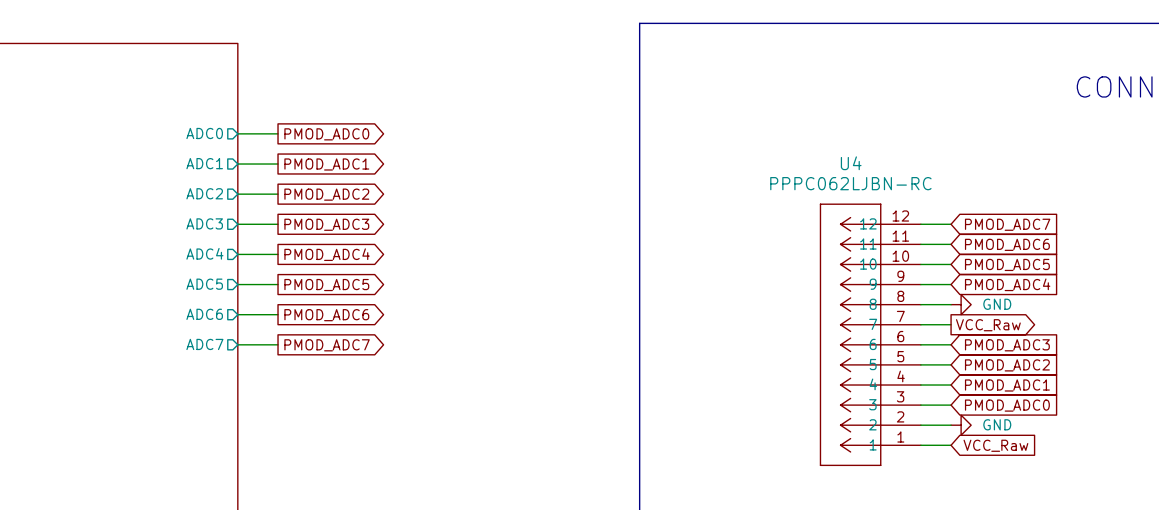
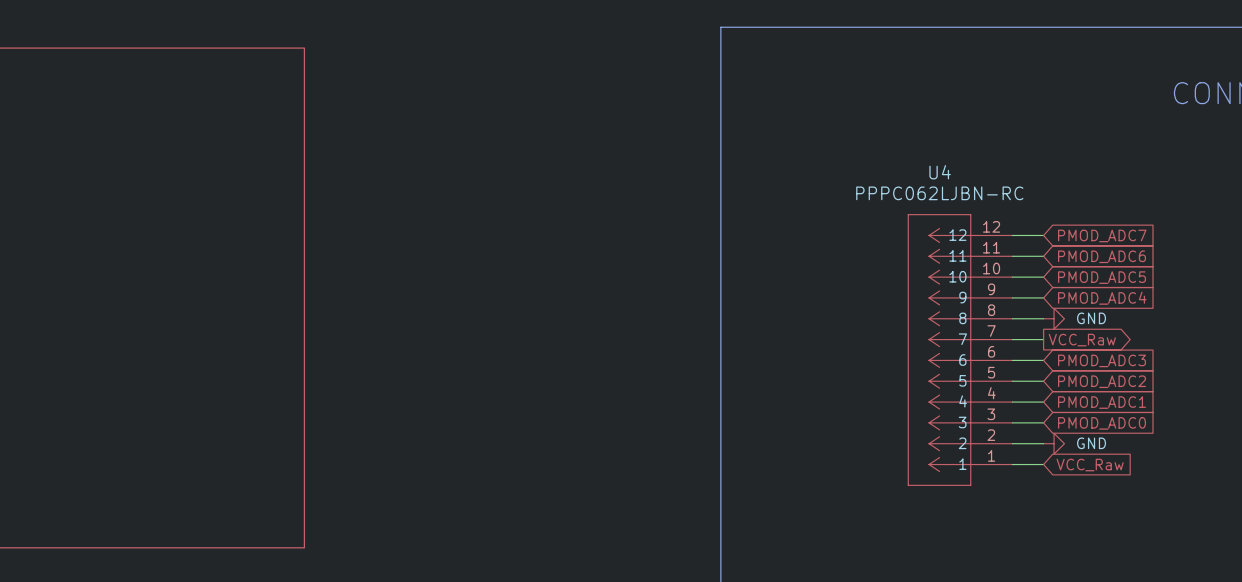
sheet pin: ADC0 (204, 133) -> none
wire: (237, 133) (278, 133) -> none
global label: PMOD_ADC0 (326, 134) -> none
sheet pin: ADC1 (204, 163) -> none
wire: (237, 164) (278, 164) -> none
global label: PMOD_ADC1 (326, 164) -> none
sheet pin: ADC2 (204, 193) -> none
wire: (237, 194) (278, 194) -> none
global label: PMOD_ADC2 (326, 194) -> none
sheet pin: ADC3 (204, 223) -> none
wire: (237, 224) (278, 224) -> none
global label: PMOD_ADC3 (326, 224) -> none
sheet pin: ADC4 (204, 253) -> none
wire: (237, 254) (278, 254) -> none
global label: PMOD_ADC4 (327, 254) -> none
sheet pin: ADC5 (204, 284) -> none
wire: (237, 284) (278, 284) -> none
global label: PMOD_ADC5 (326, 285) -> none
sheet pin: ADC6 (204, 314) -> none
wire: (237, 314) (278, 314) -> none
global label: PMOD_ADC6 (326, 315) -> none
sheet pin: ADC7 (204, 344) -> none
wire: (237, 344) (278, 344) -> none
global label: PMOD_ADC7 (327, 345) -> none

